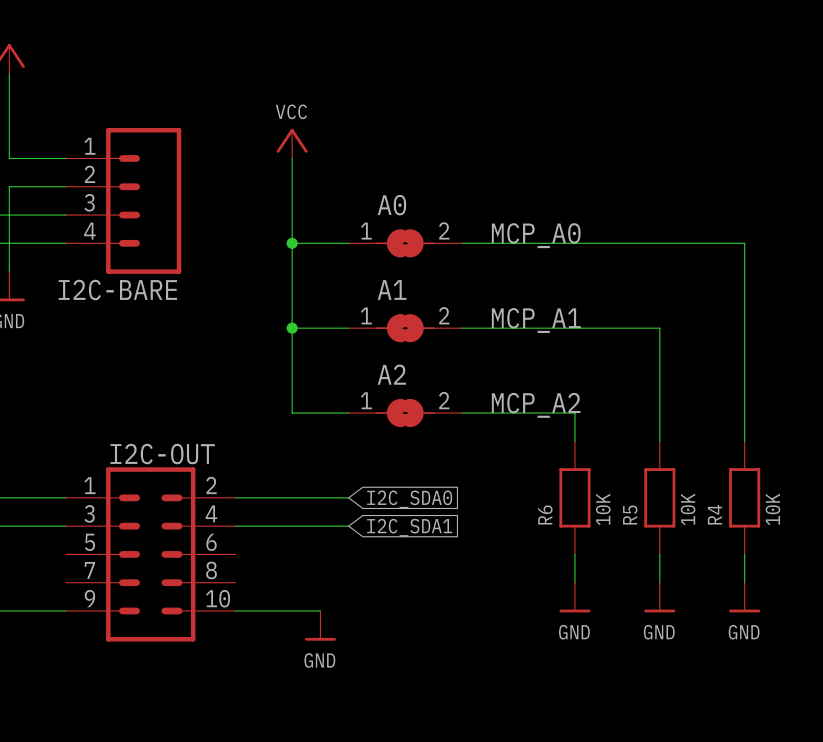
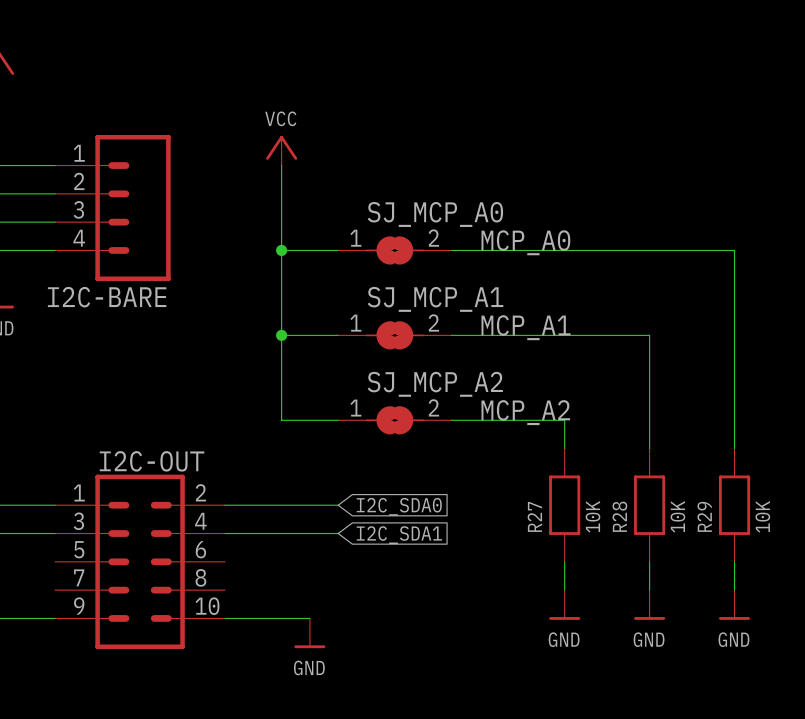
A0 name: A0 (391, 205) -> SJ_MCP_A0 (435, 214)
A1 name: A1 (392, 289) -> SJ_MCP_A1 (435, 299)
A2 name: A2 (391, 374) -> SJ_MCP_A2 (435, 384)
R6 name: R6 (545, 514) -> R27 (534, 516)
R5 name: R5 (630, 514) -> R28 (619, 516)
R4 name: R4 (714, 514) -> R29 (704, 516)

